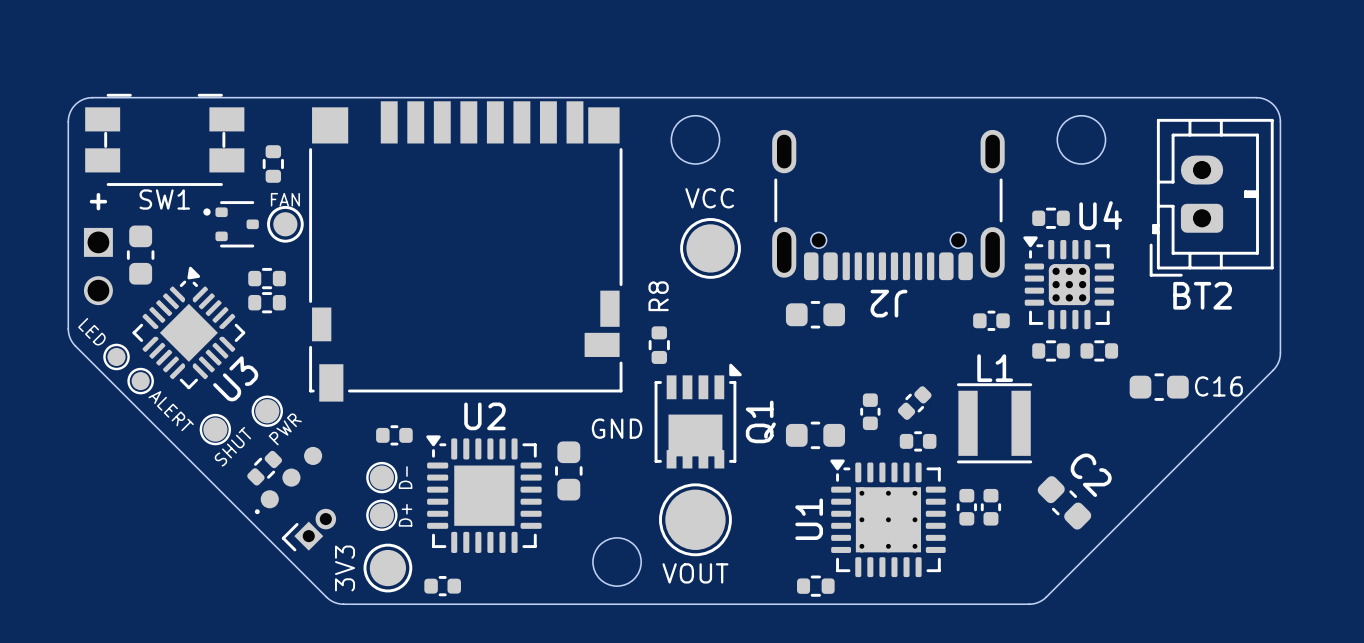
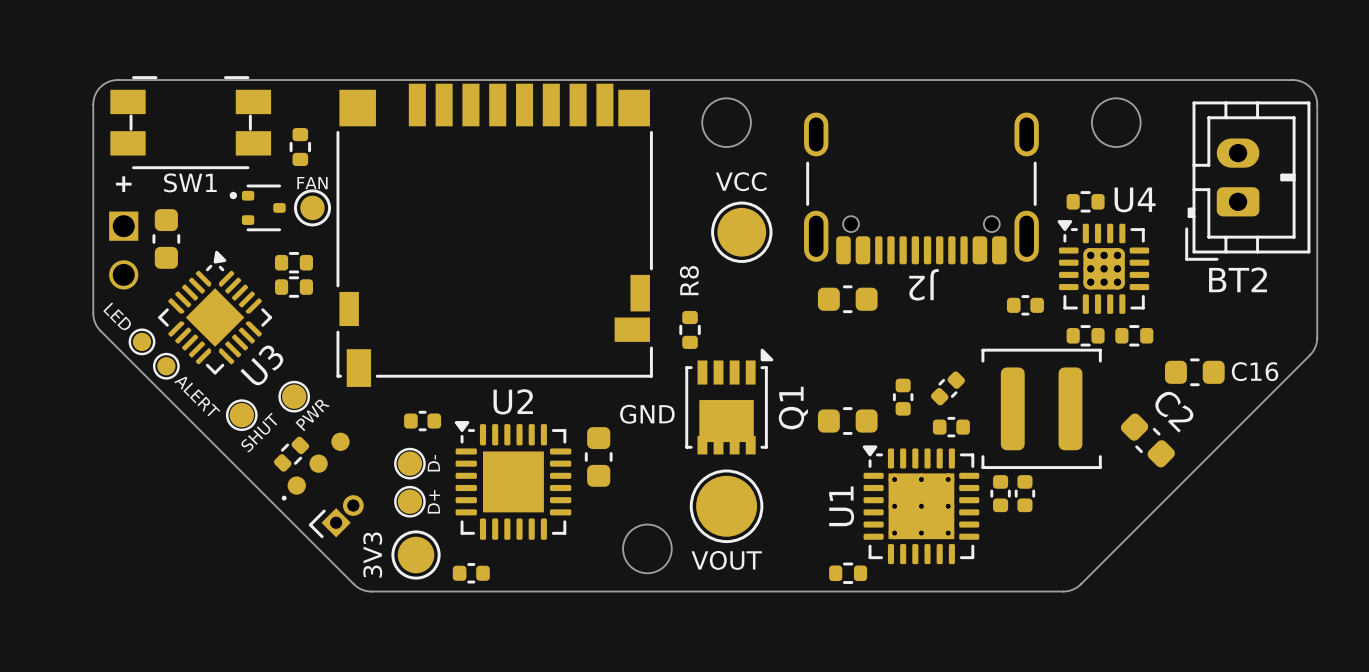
L1: (994, 423) -> none
part: none -> (1041, 408)
C2 position: (1064, 502) -> (1147, 440)

